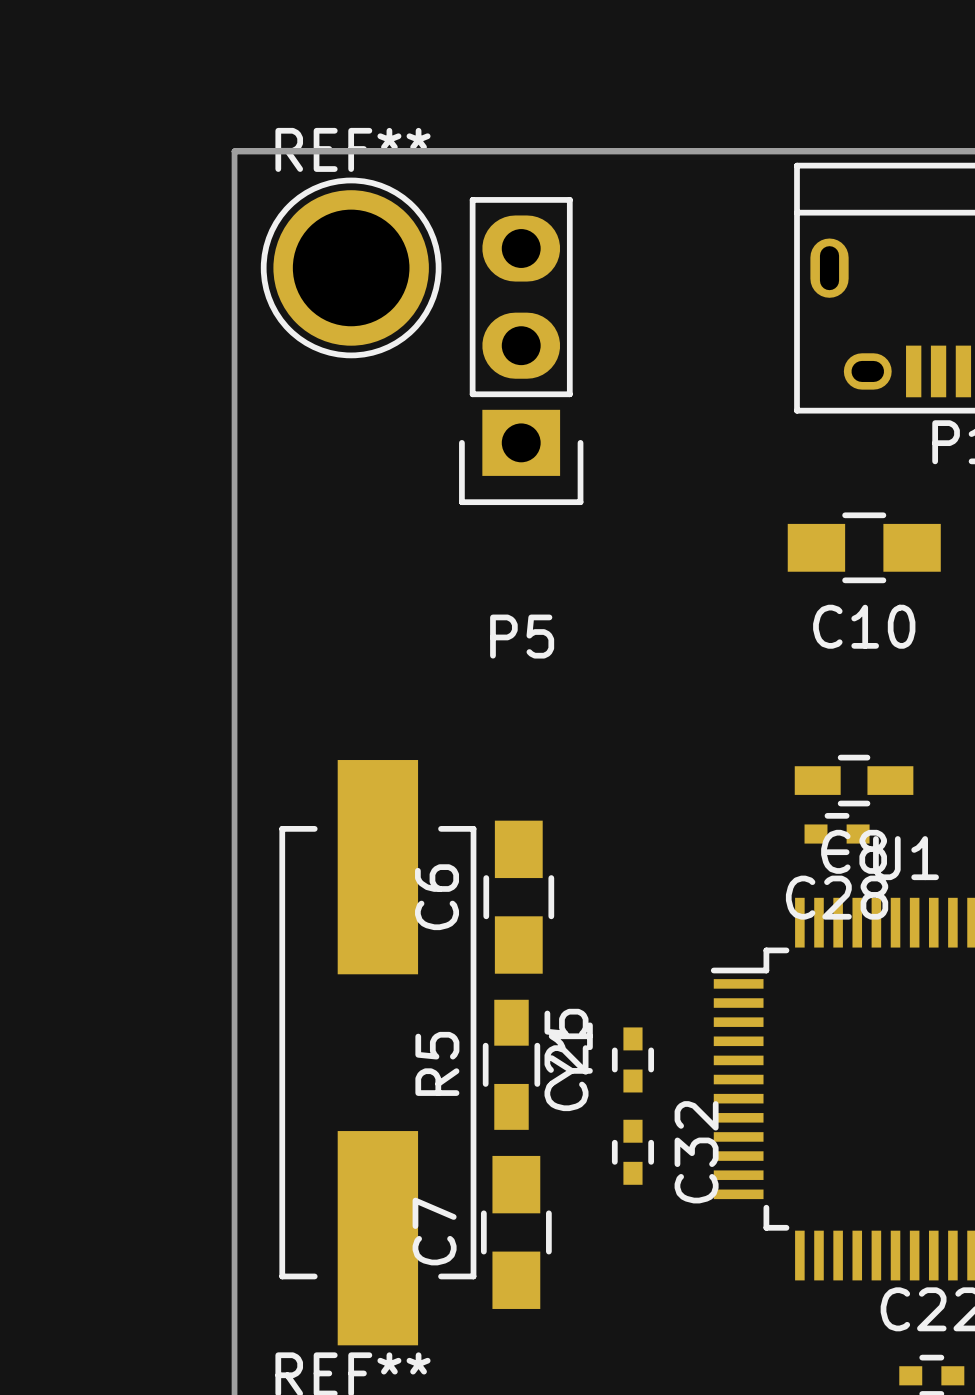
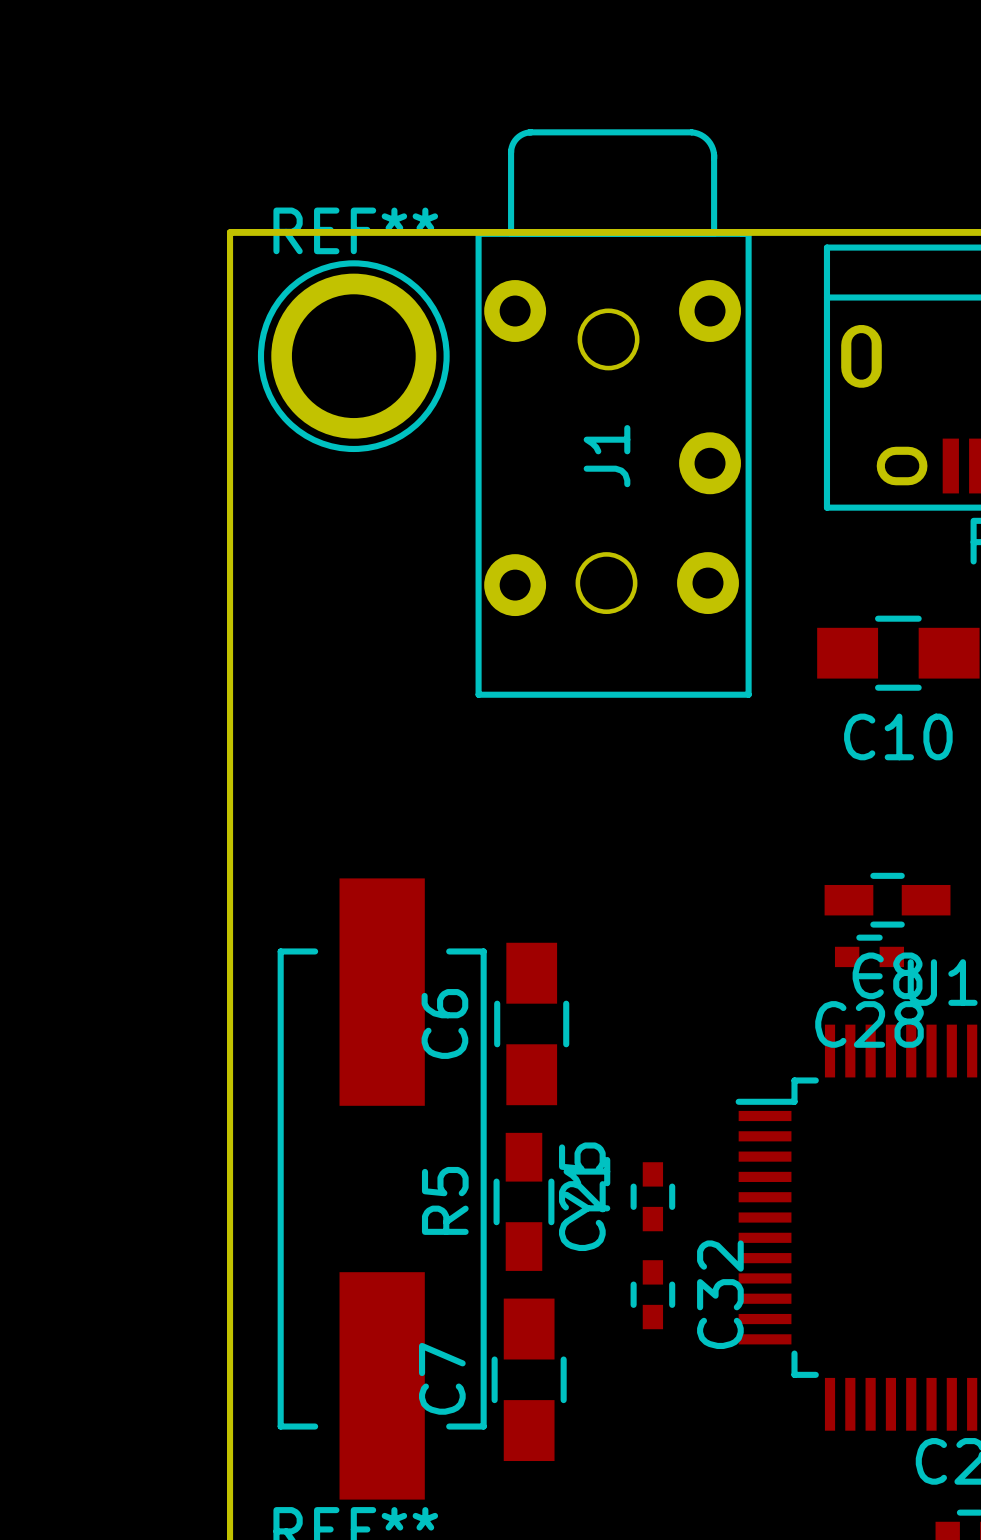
J1: none -> (613, 413)
P5: (521, 351) -> none

